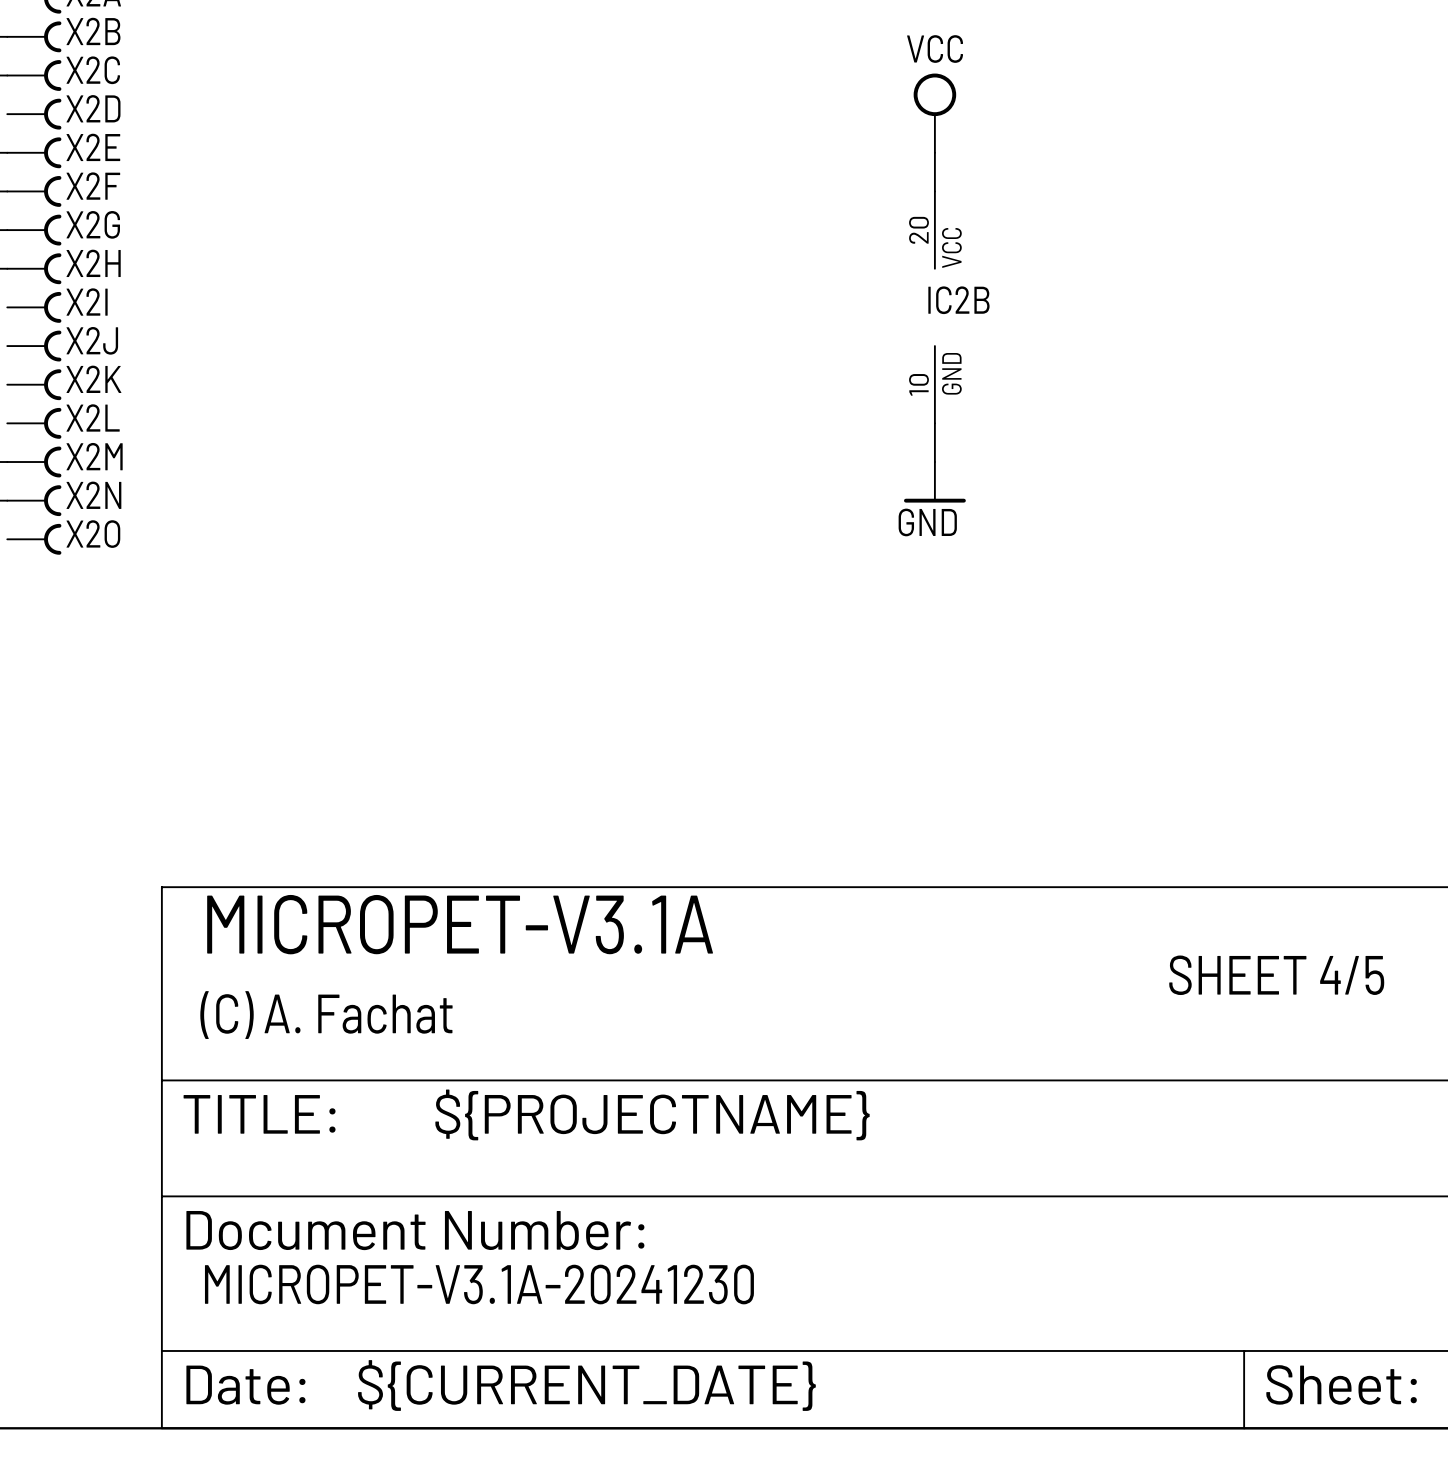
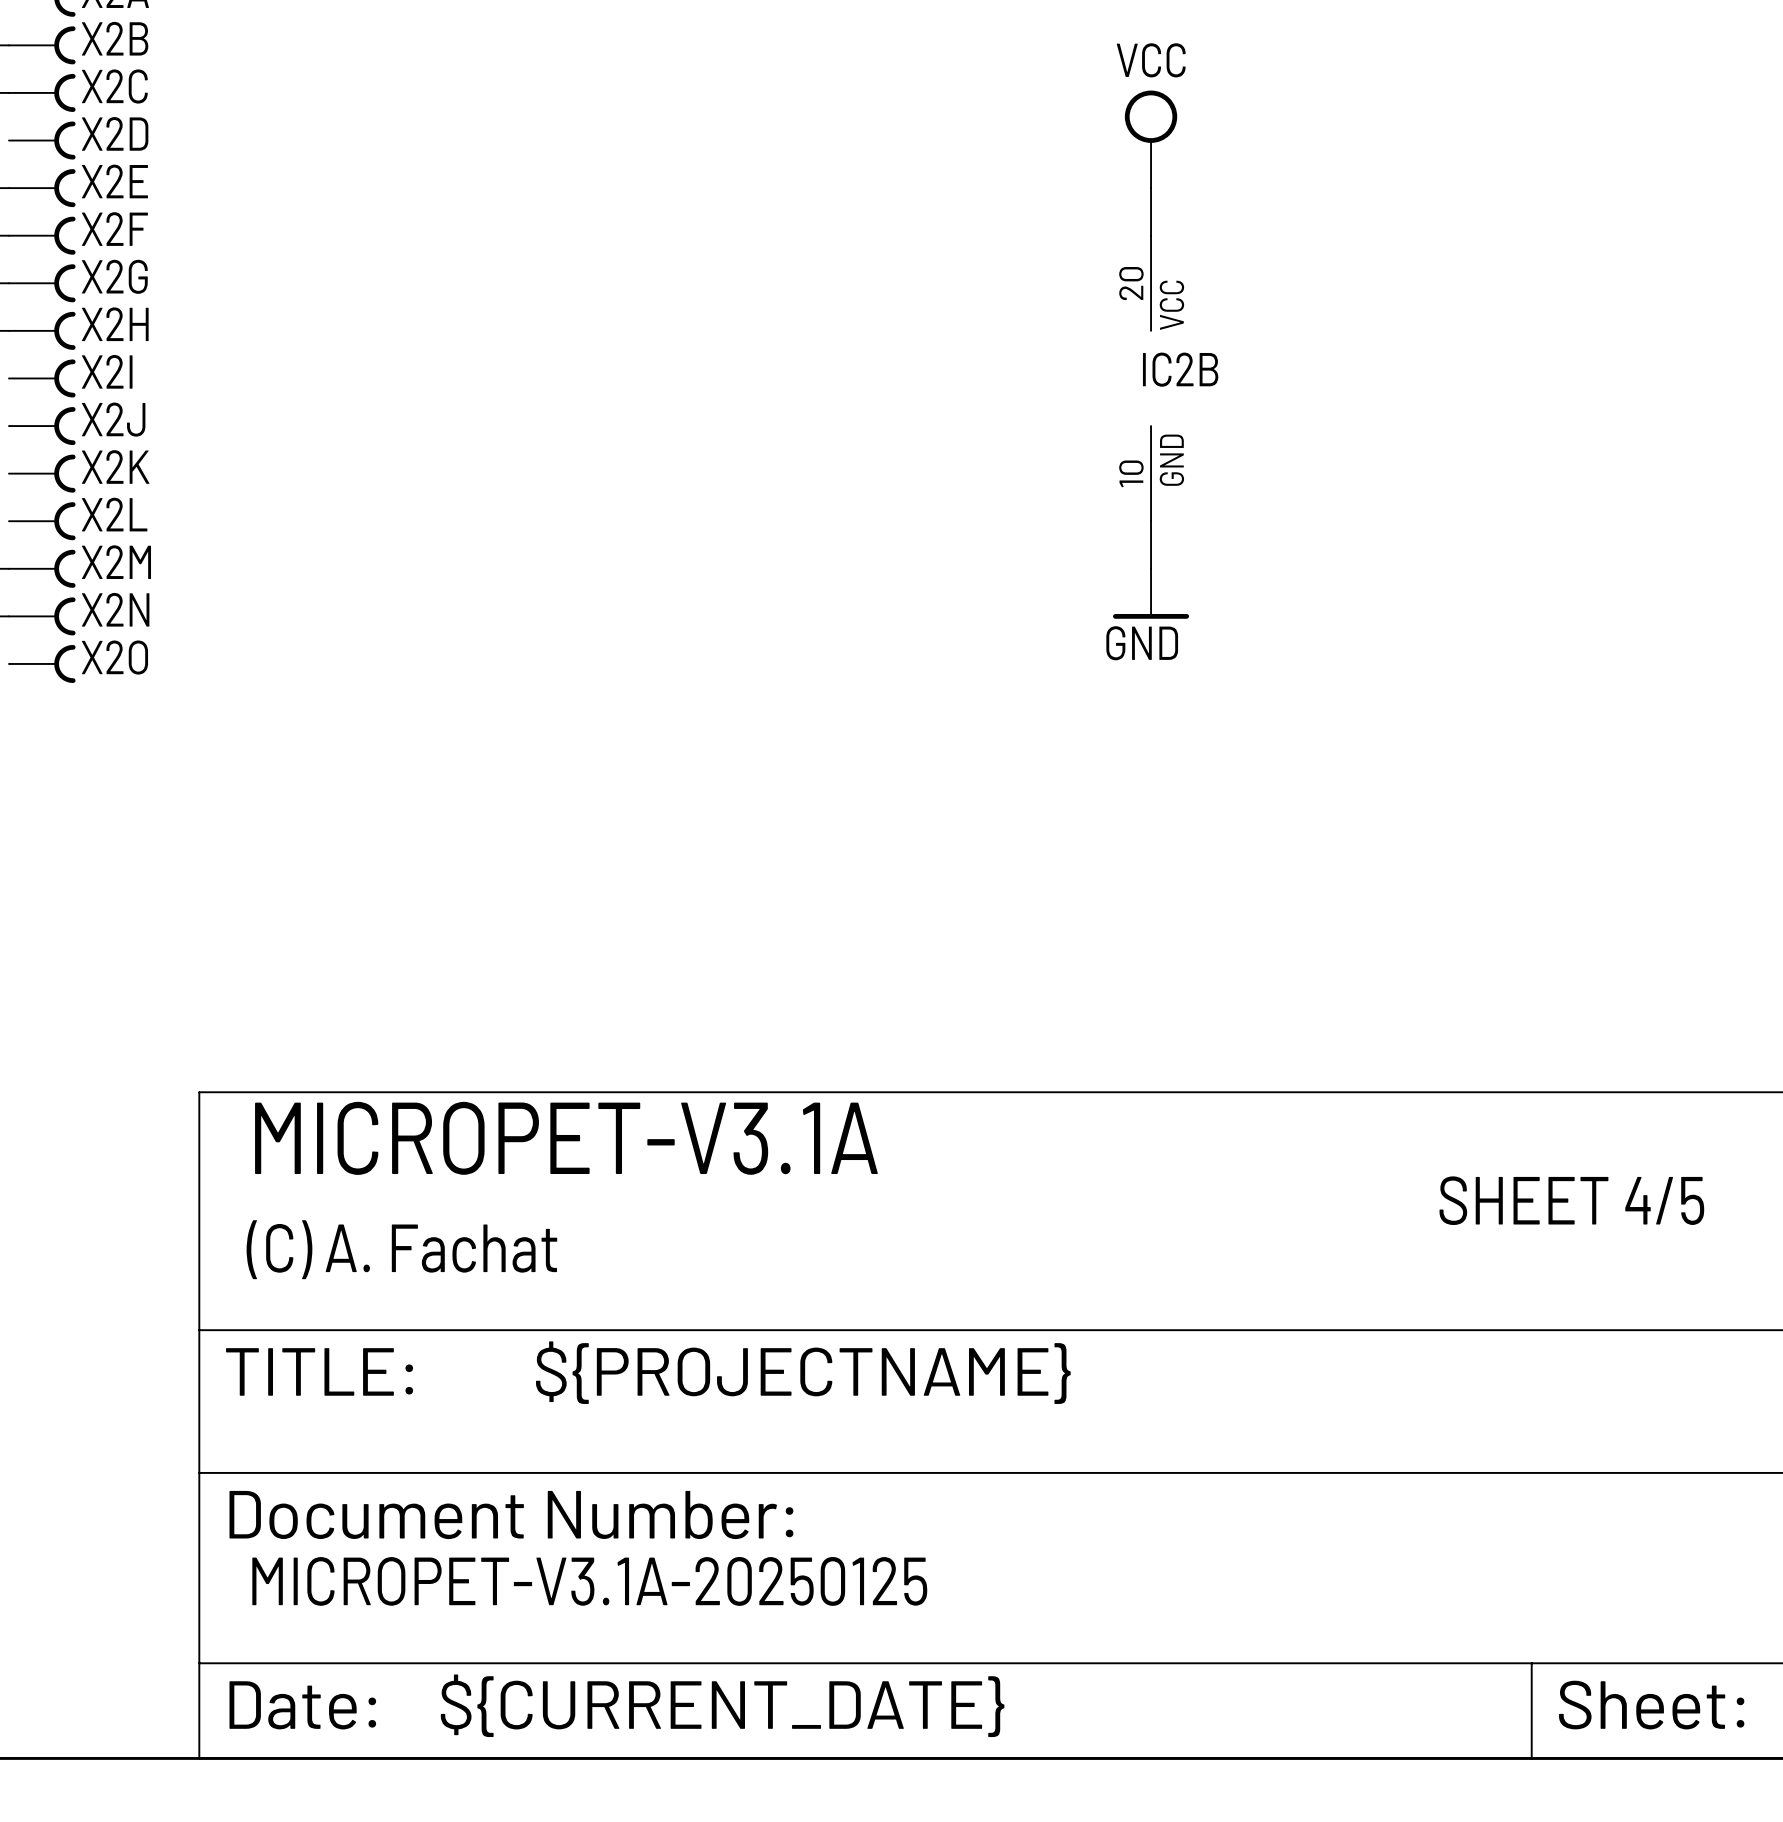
text: MICROPET-V3.1A-20241230 (479, 1284) -> MICROPET-V3.1A-20250125 (589, 1581)

